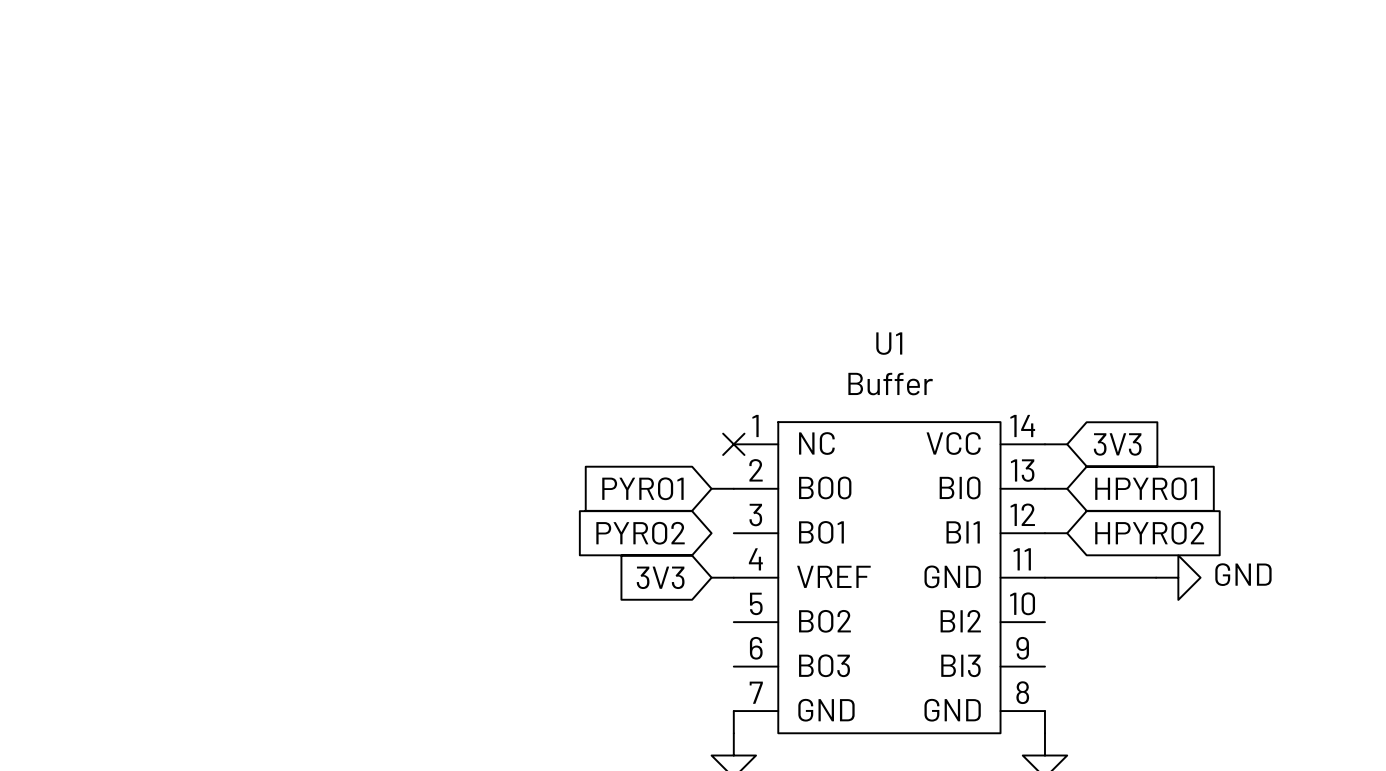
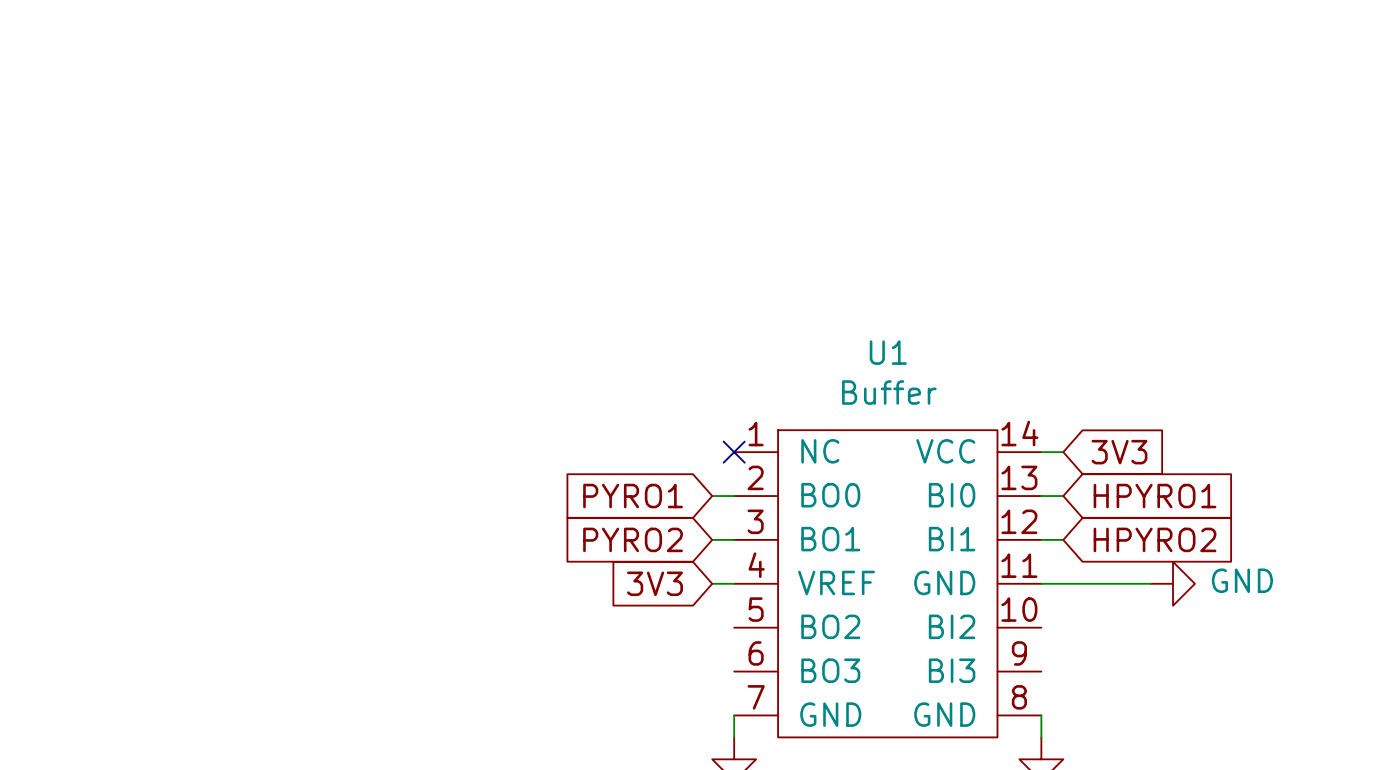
wire: none -> (712, 539) (734, 539)

